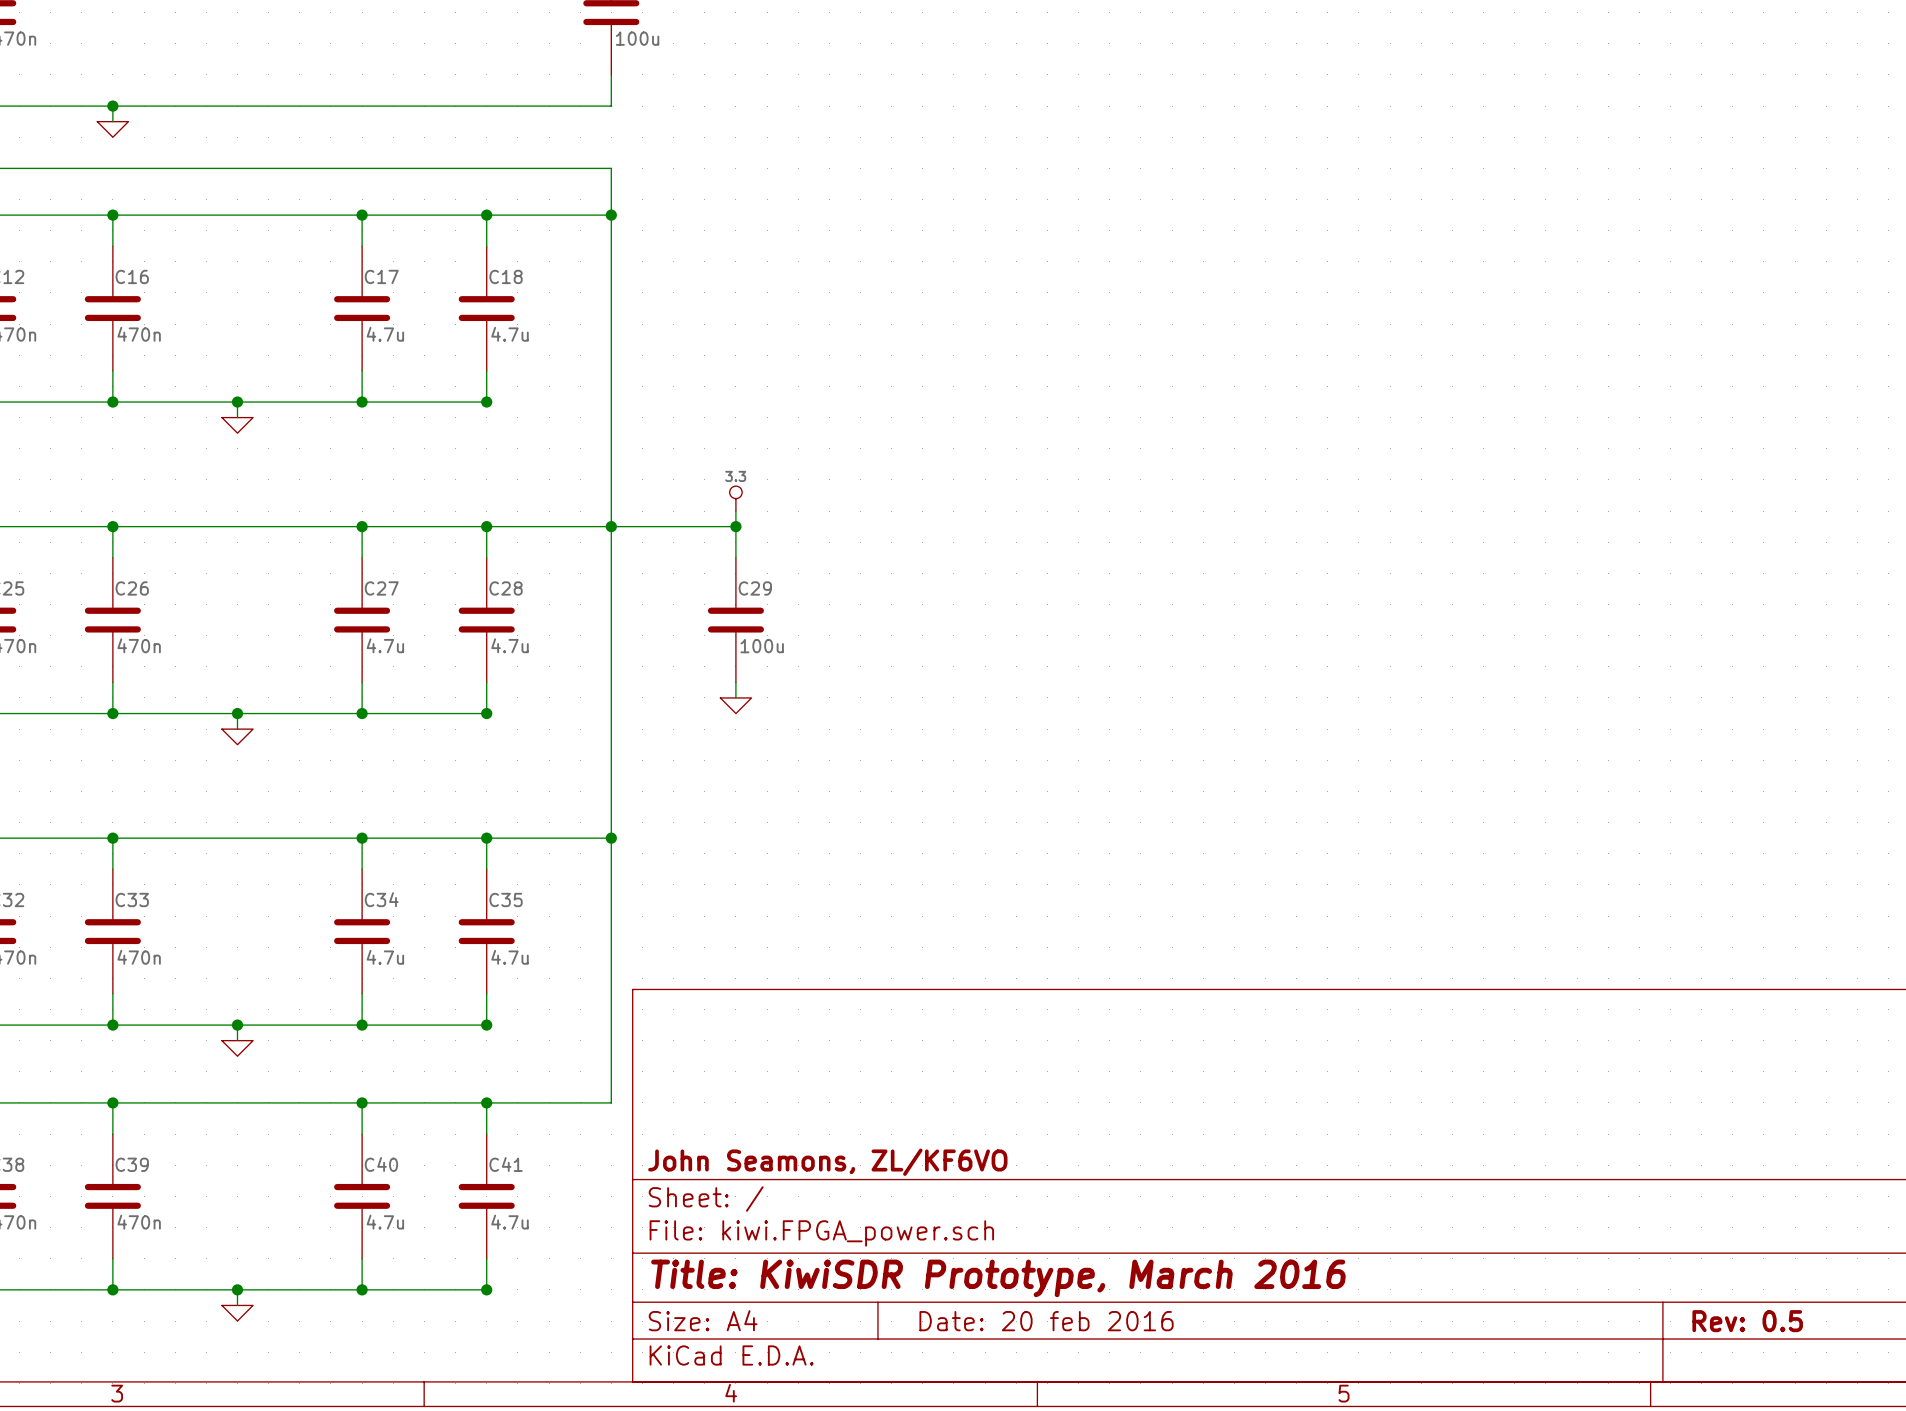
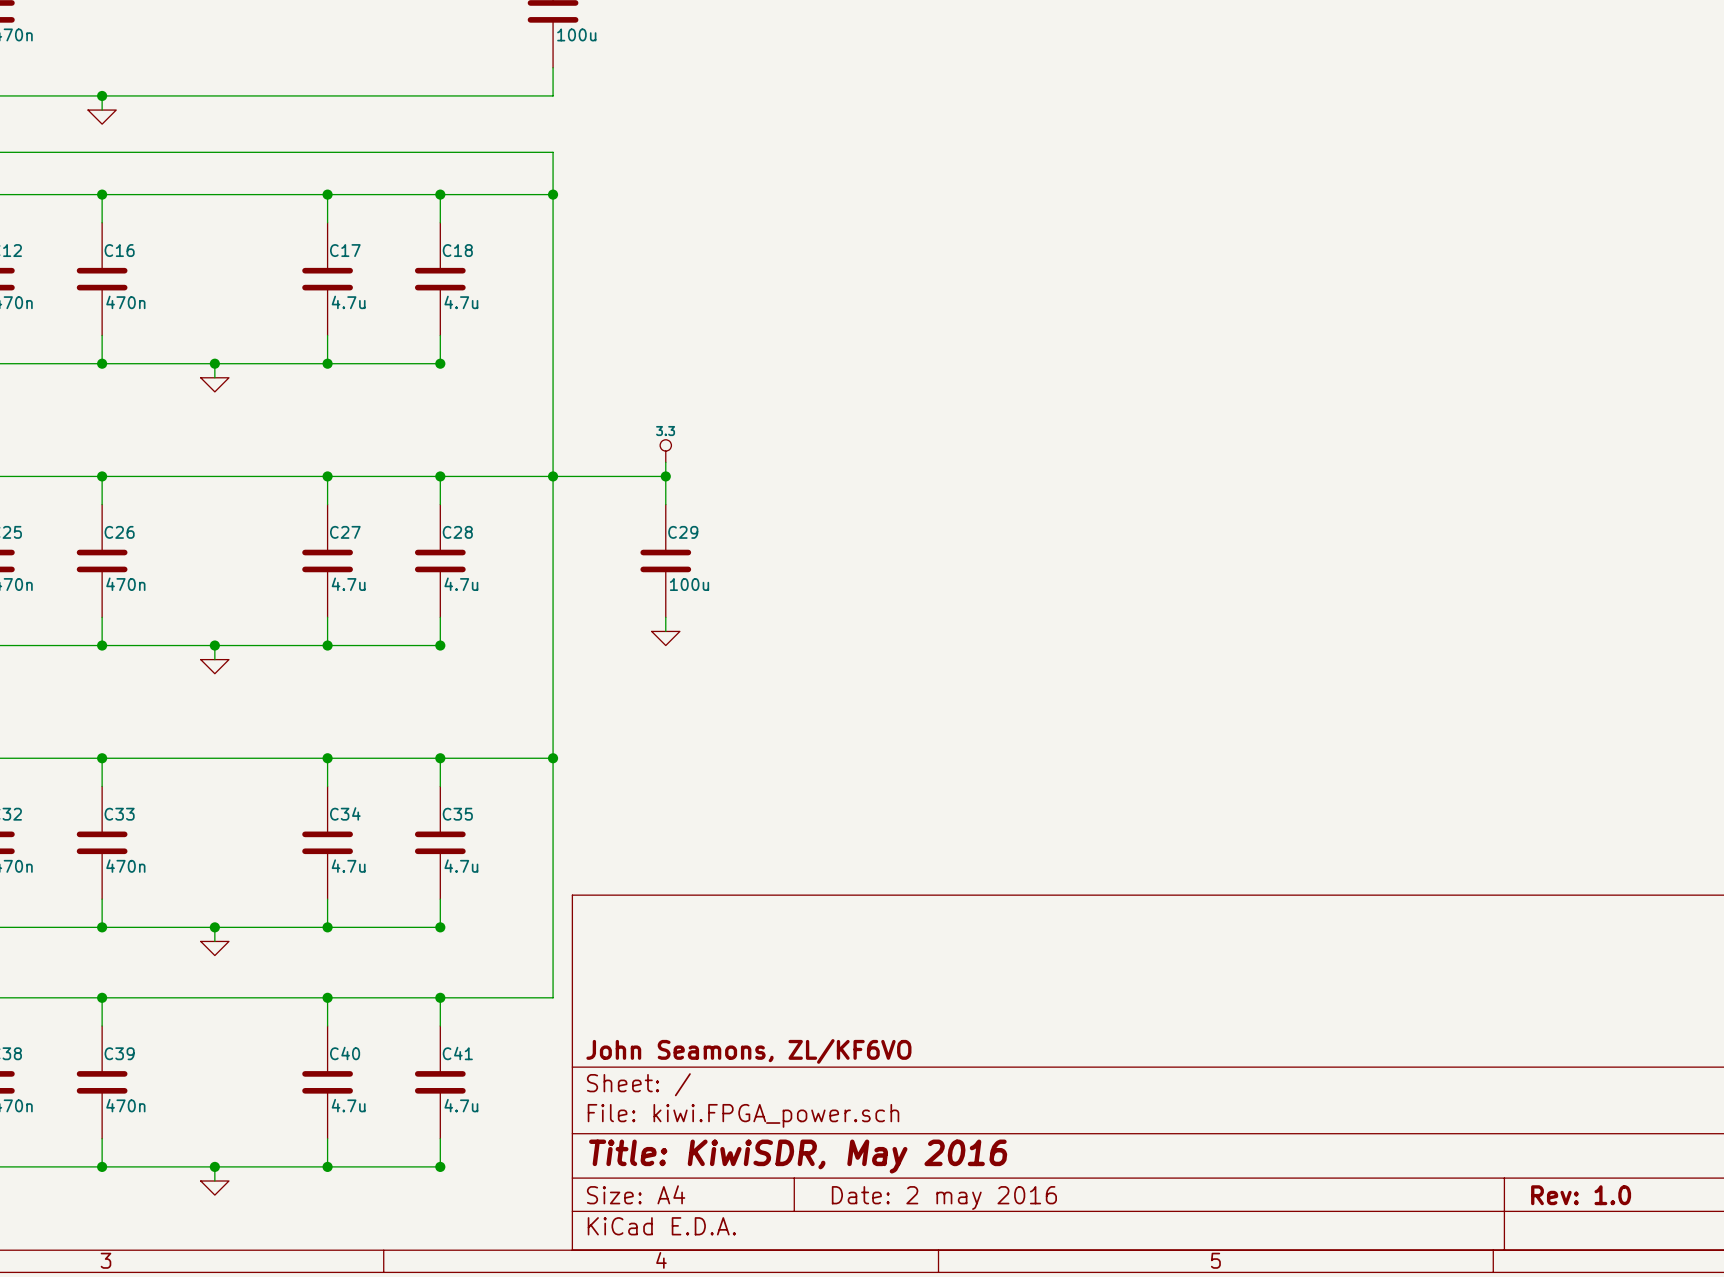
title block: Title: KiwiSDR Prototype, March 2016 (998, 1278) -> Title: KiwiSDR, May 2016 (798, 1156)
title block: Date: 20 feb 2016 (1046, 1321) -> Date: 2 may 2016 (944, 1197)
title block: Rev: 0.5 (1747, 1321) -> Rev: 1.0 (1581, 1195)

